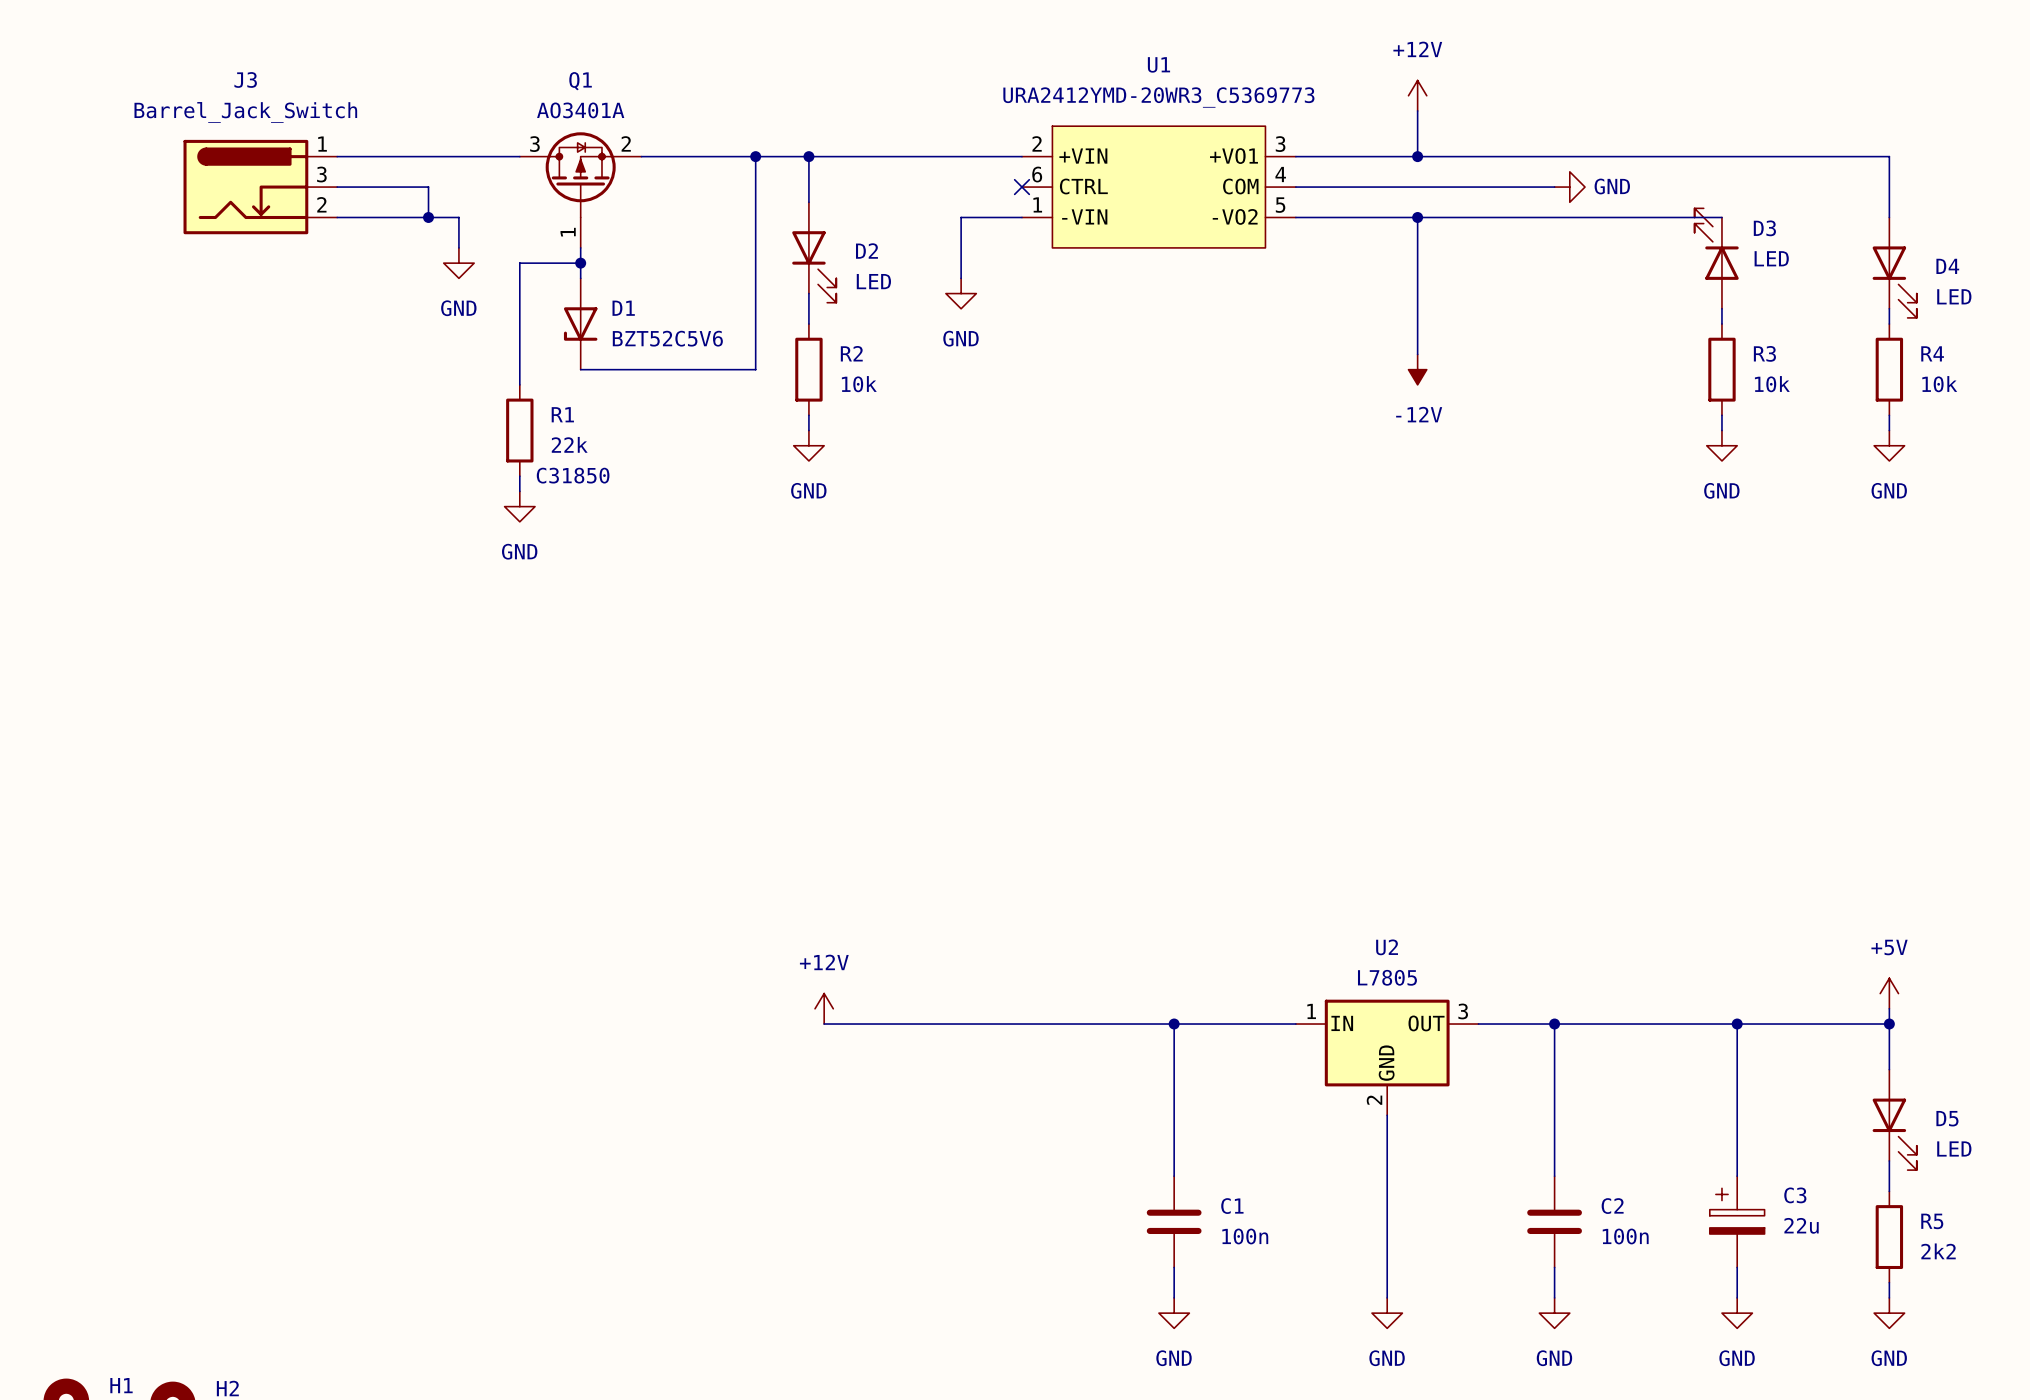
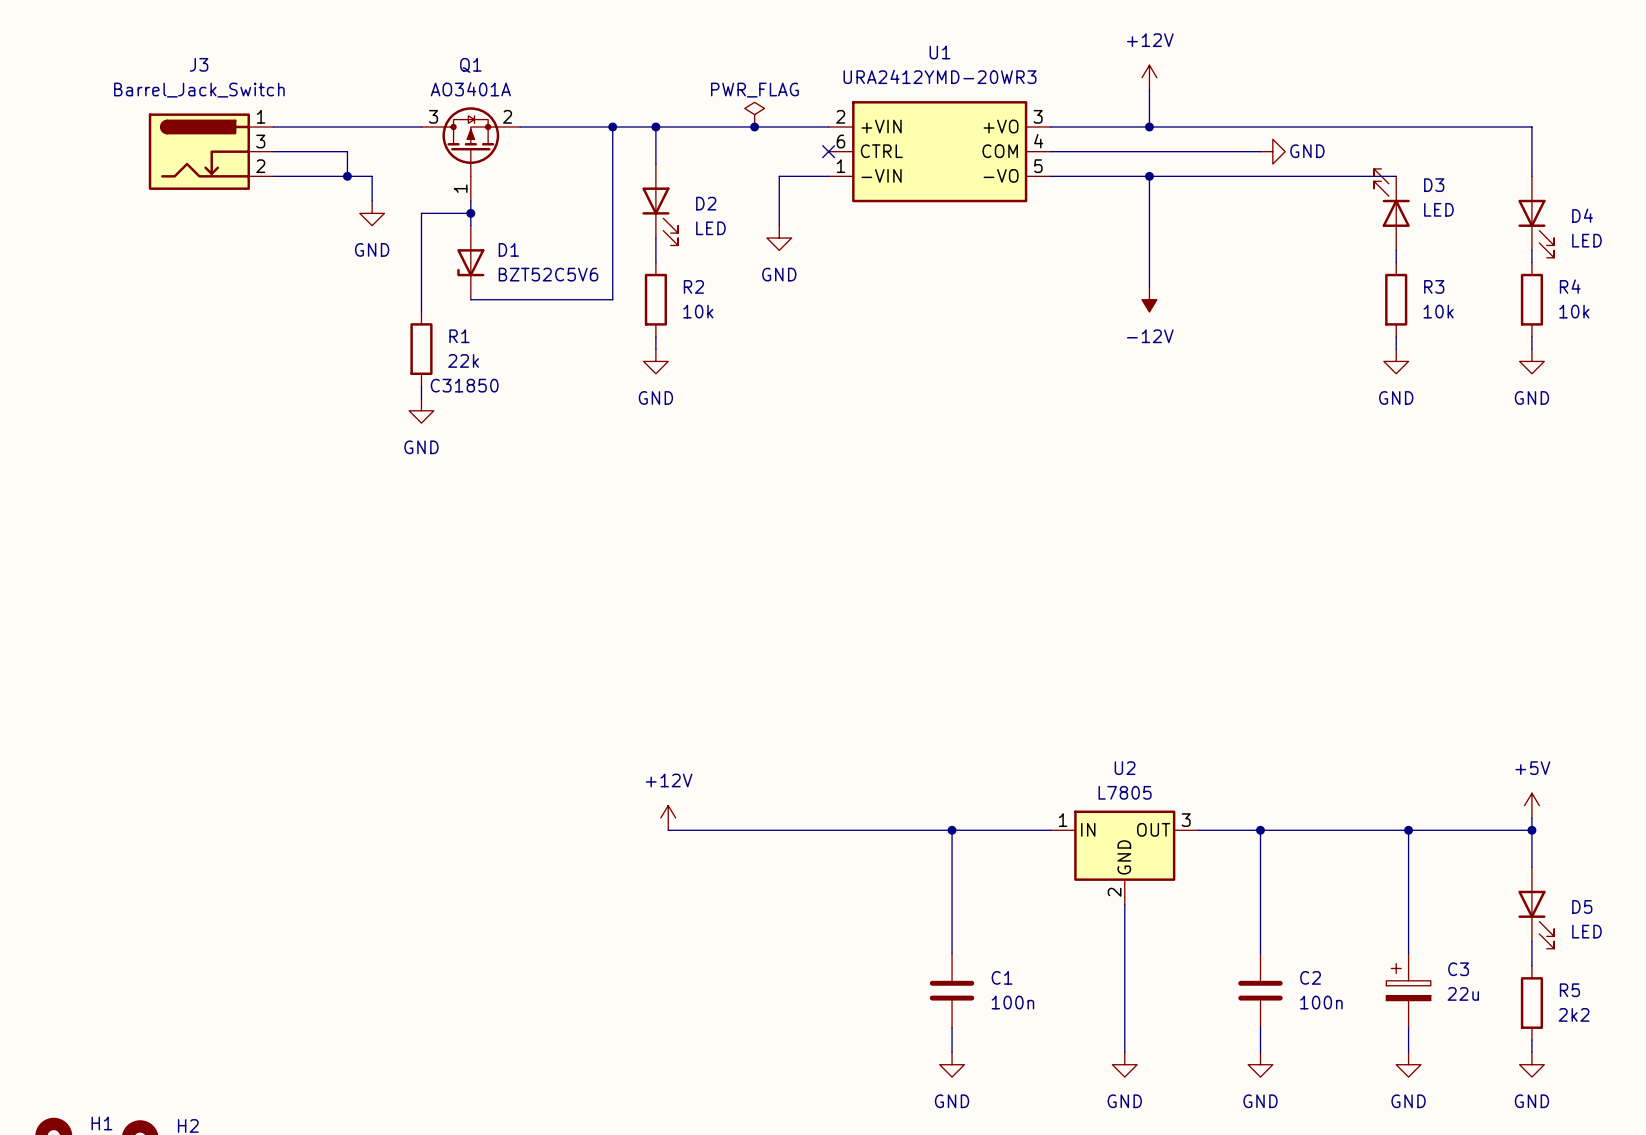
U1 value: URA2412YMD-20WR3_C5369773 (1158, 97) -> URA2412YMD-20WR3 (939, 76)
U1 symbol: [1021, 126, 1296, 248] -> [828, 101, 1051, 203]
power symbol: none -> PWR_FLAG (754, 114)
junction: none -> (754, 126)

